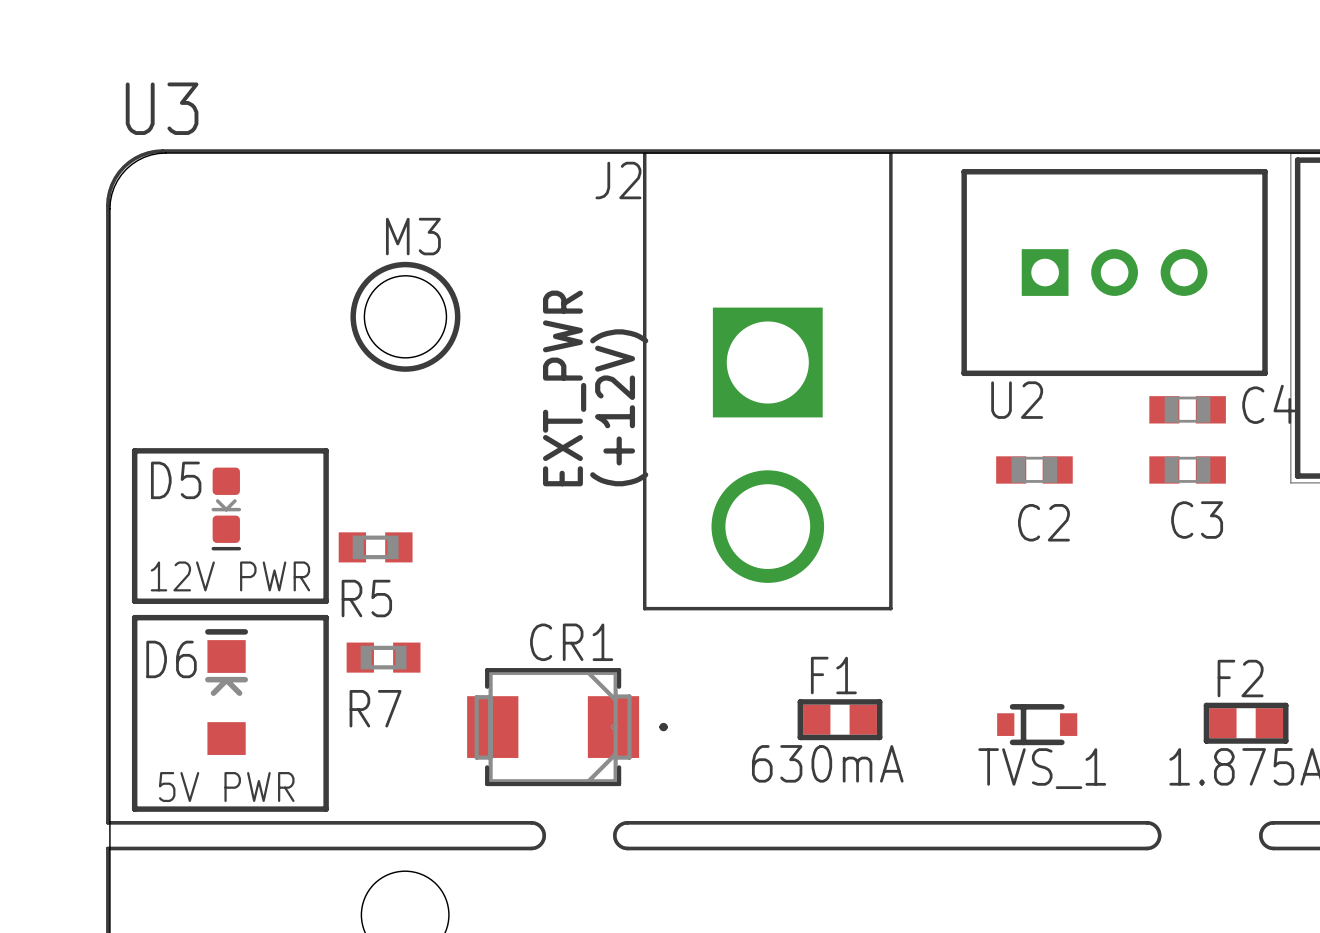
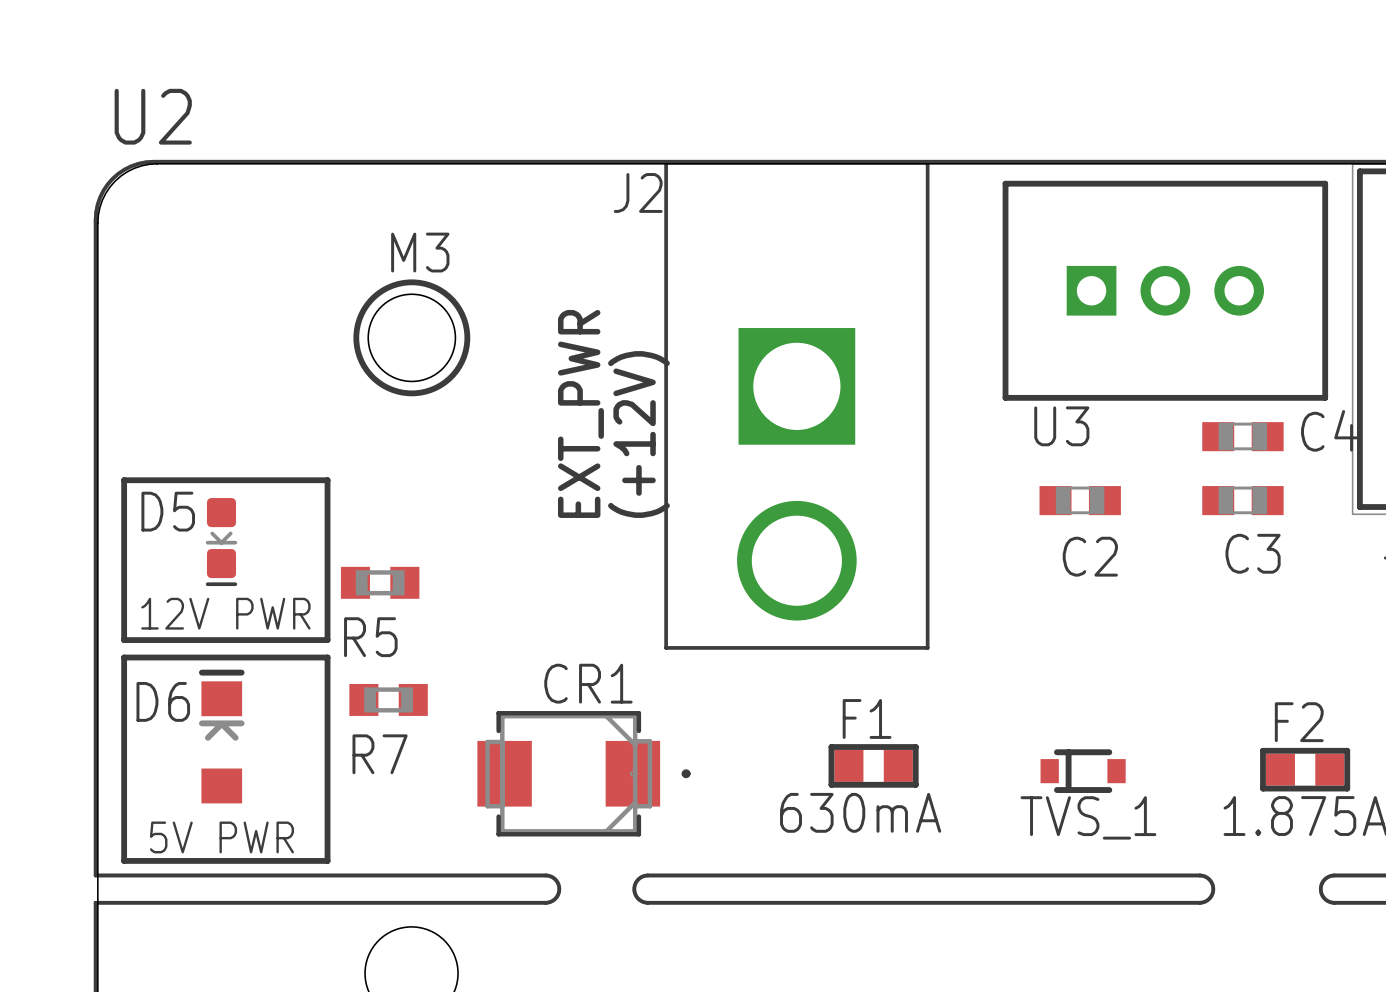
U3 name: U3 (162, 108) -> U2 (153, 116)
U2 name: U2 (1017, 400) -> U3 (1061, 426)

